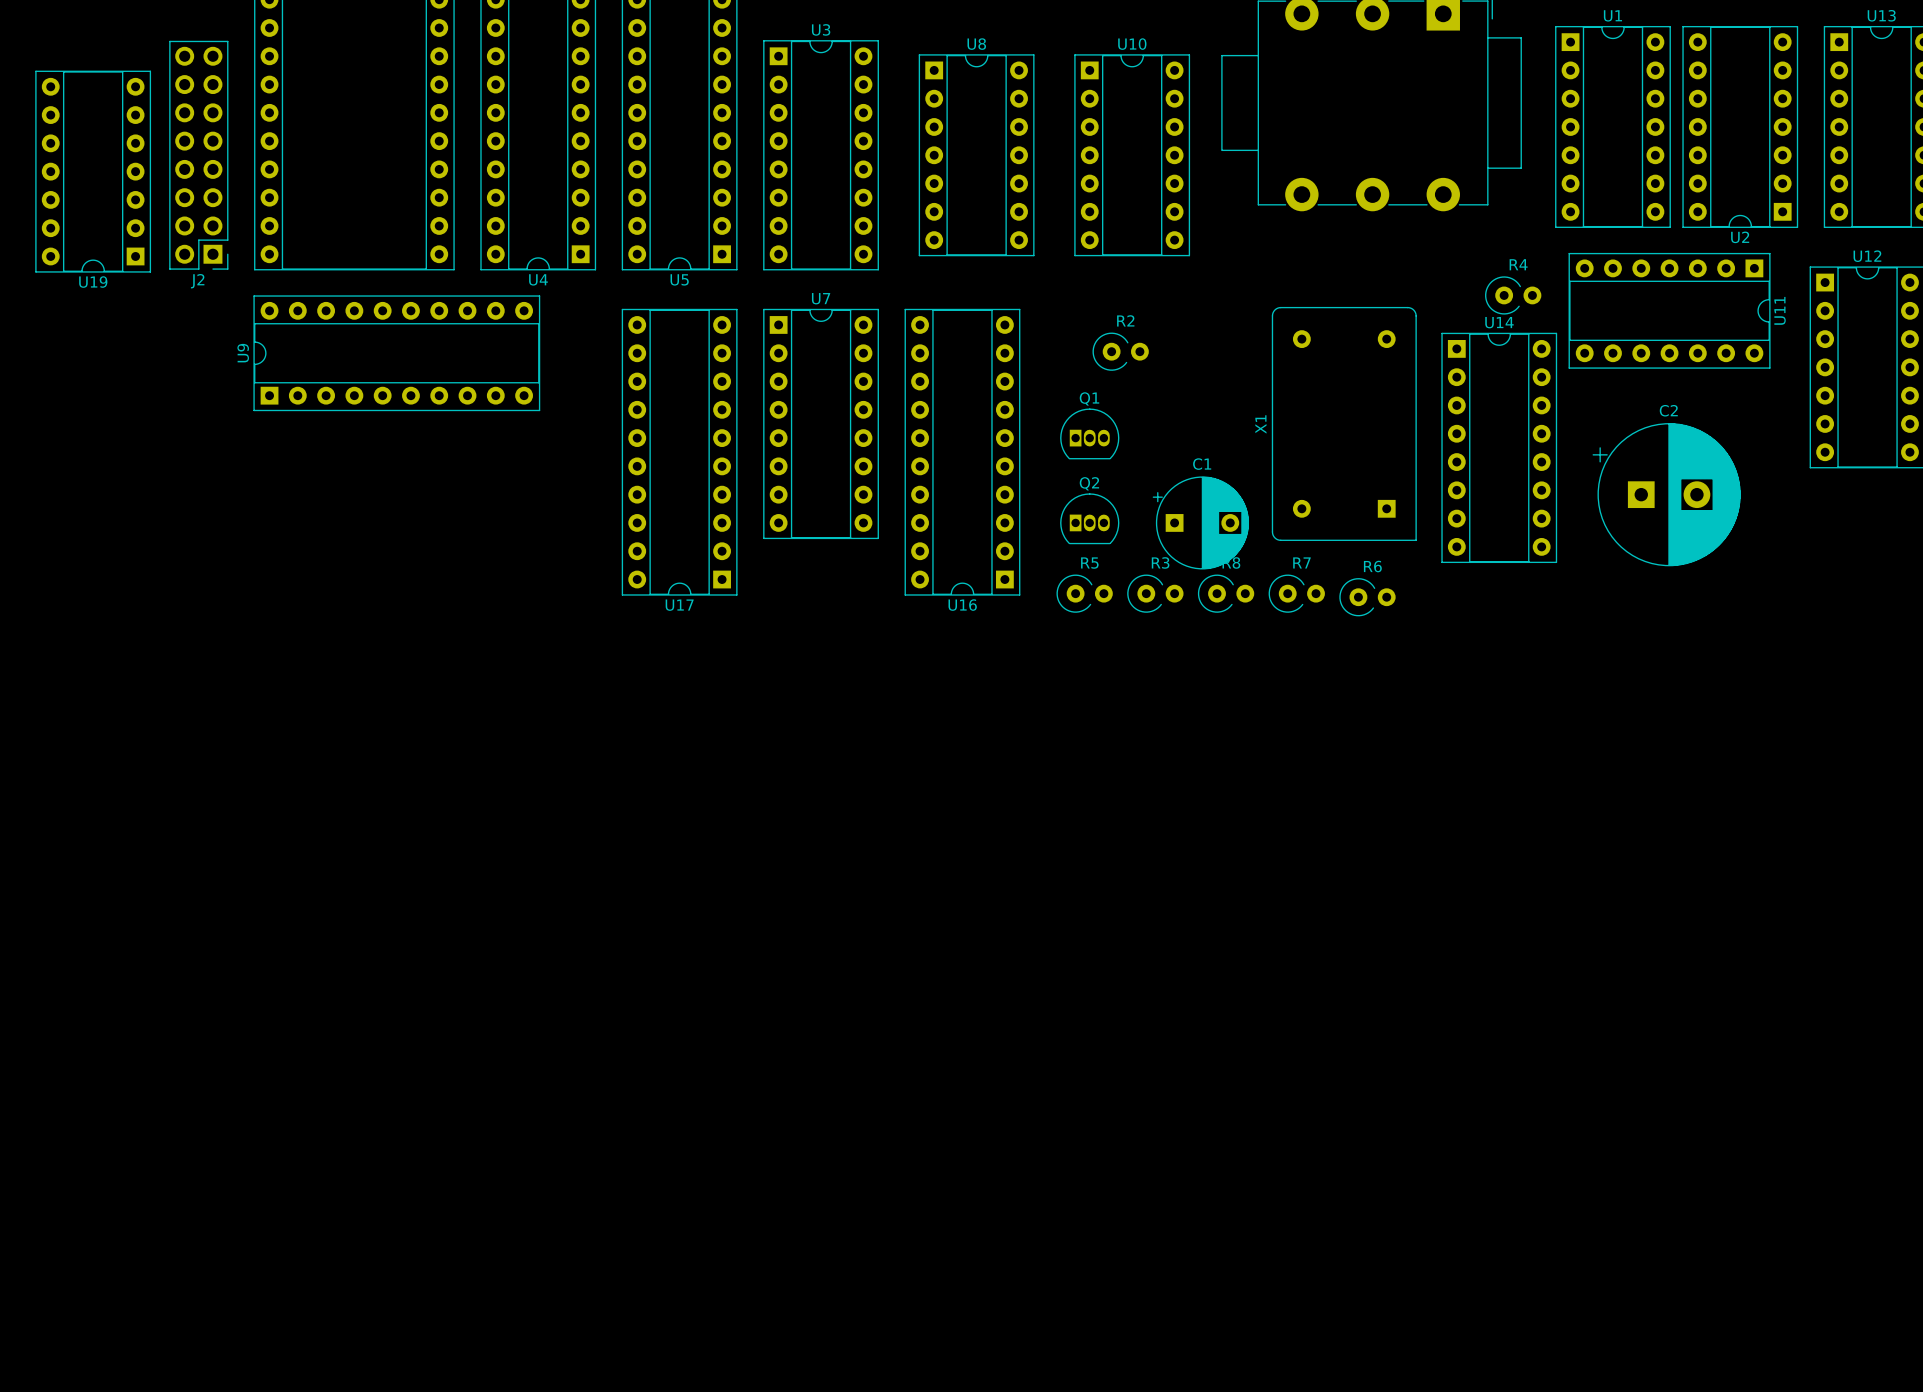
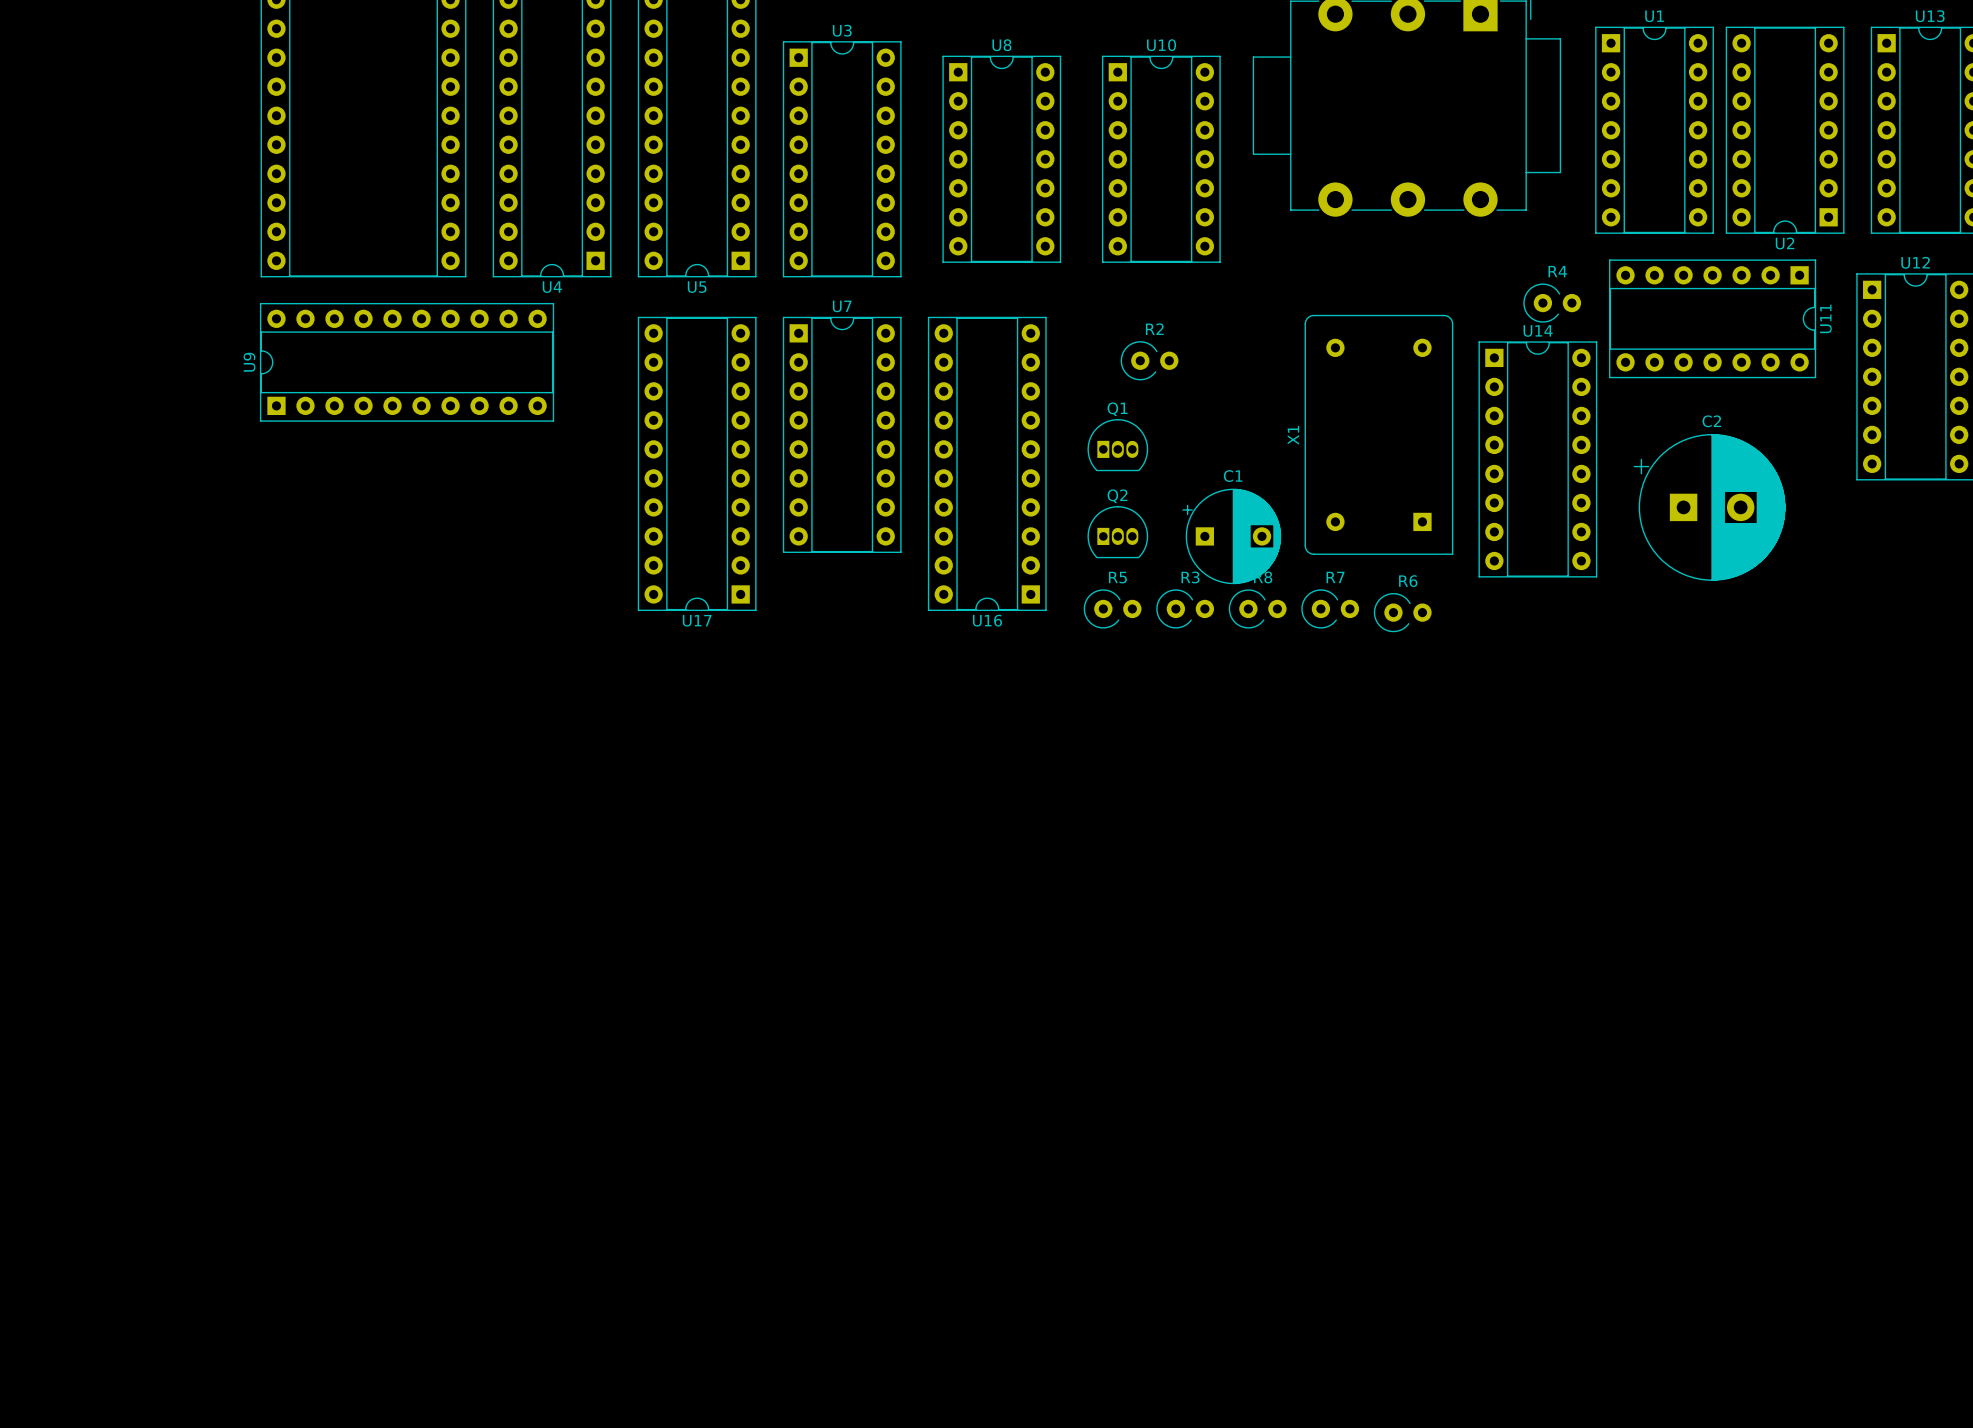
J2: (198, 155) -> none
U19: (93, 171) -> none

